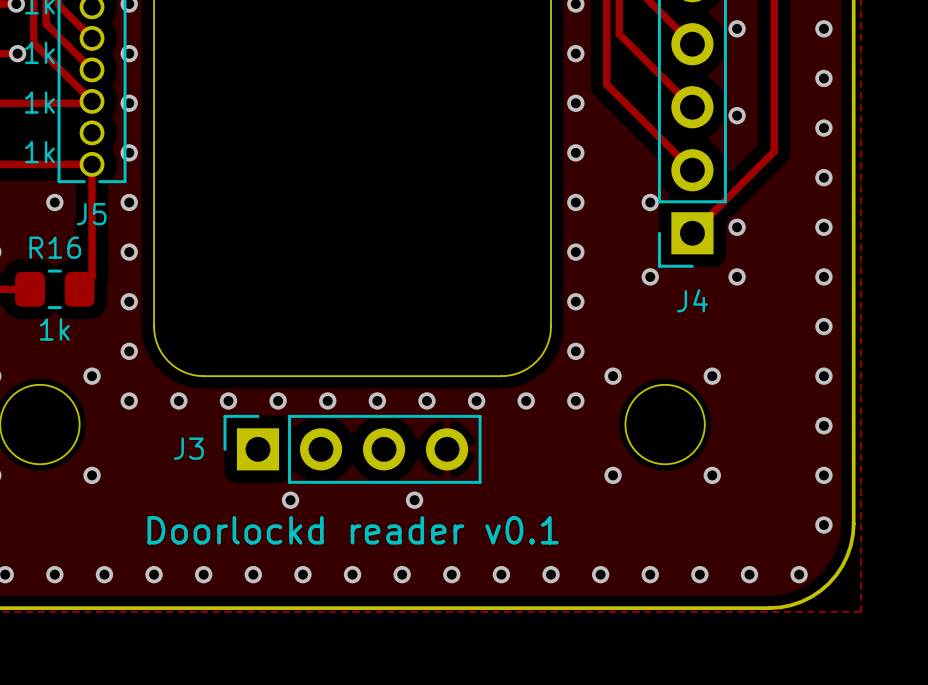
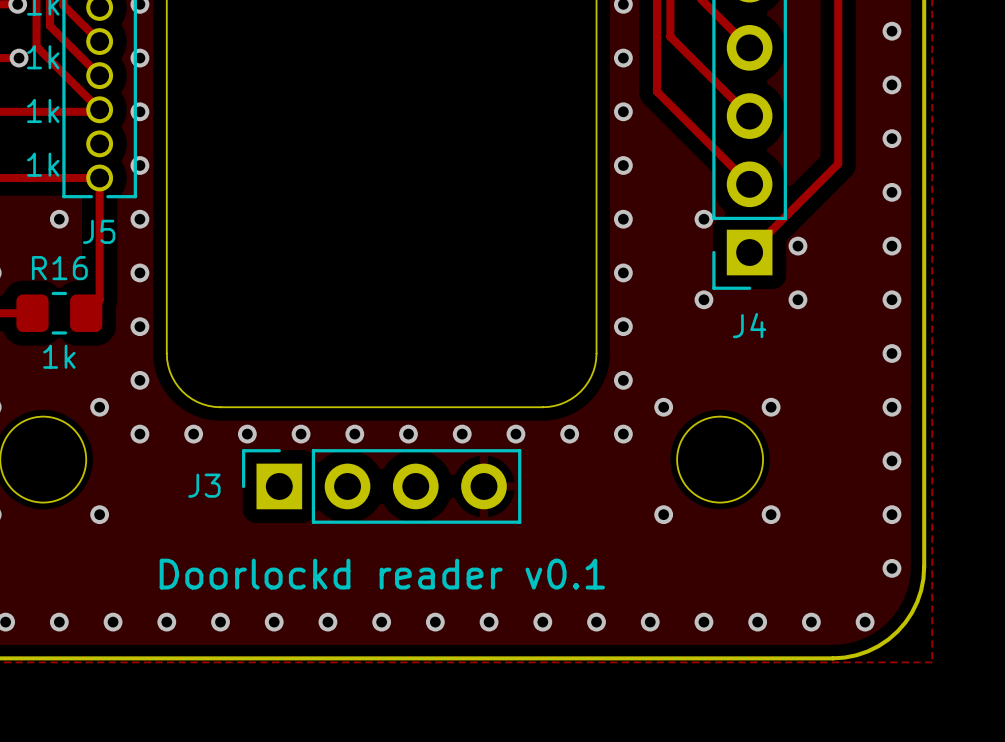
via: (737, 28) -> none
via: (737, 115) -> none
via: (290, 500) -> none
via: (414, 500) -> none

